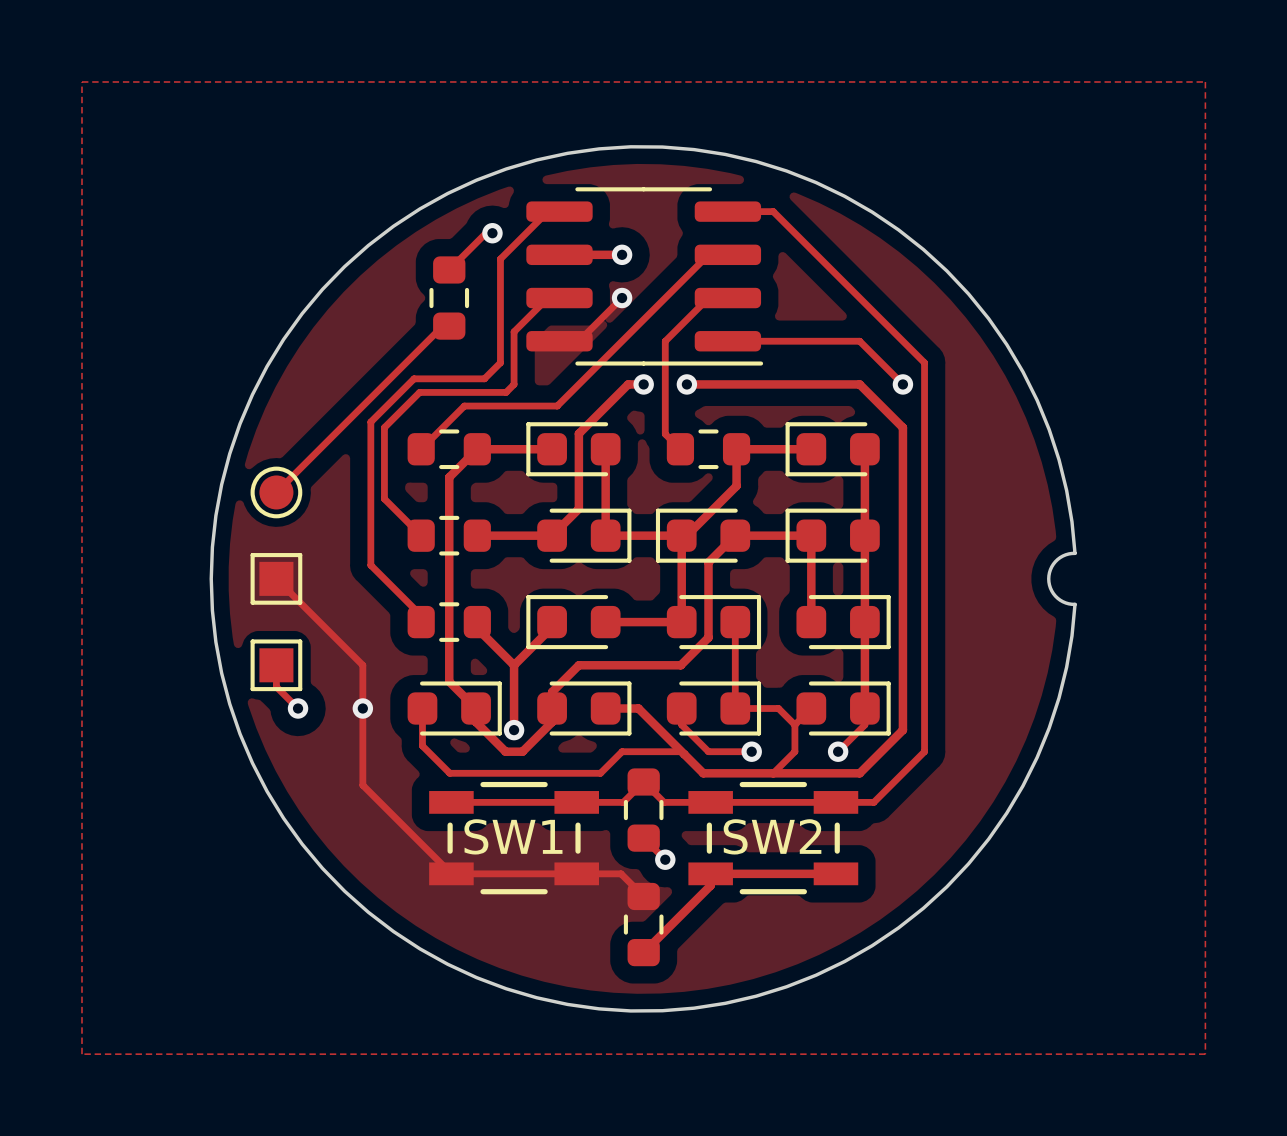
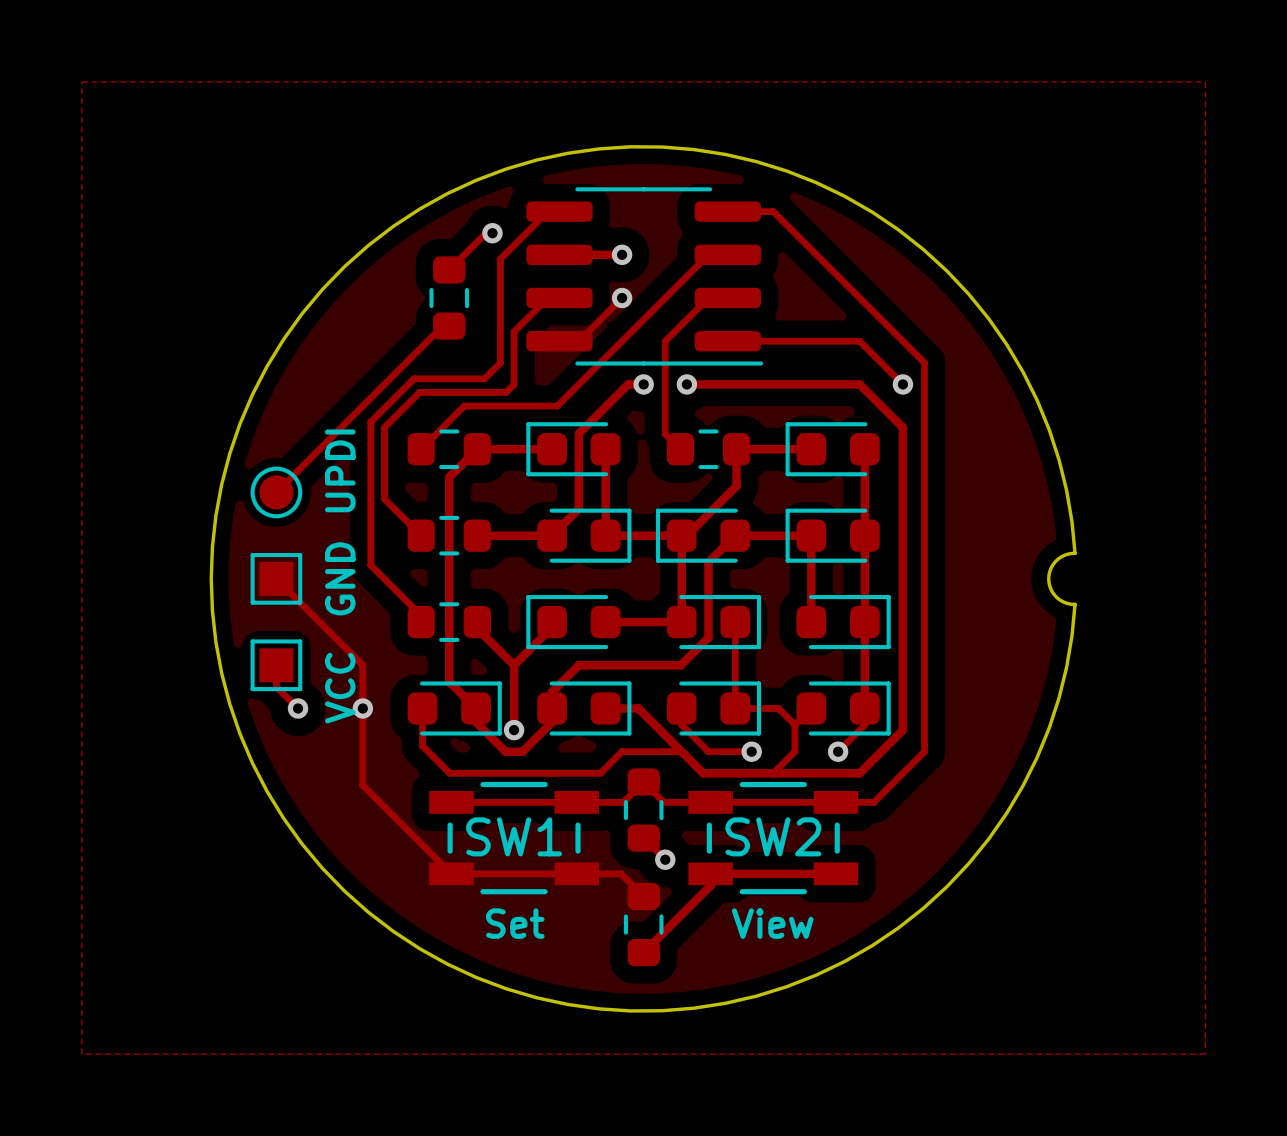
text: none -> UPDI (340, 470)
text: none -> GND (340, 578)
text: none -> VCC (340, 688)
text: none -> Set (515, 923)
text: none -> View (772, 923)

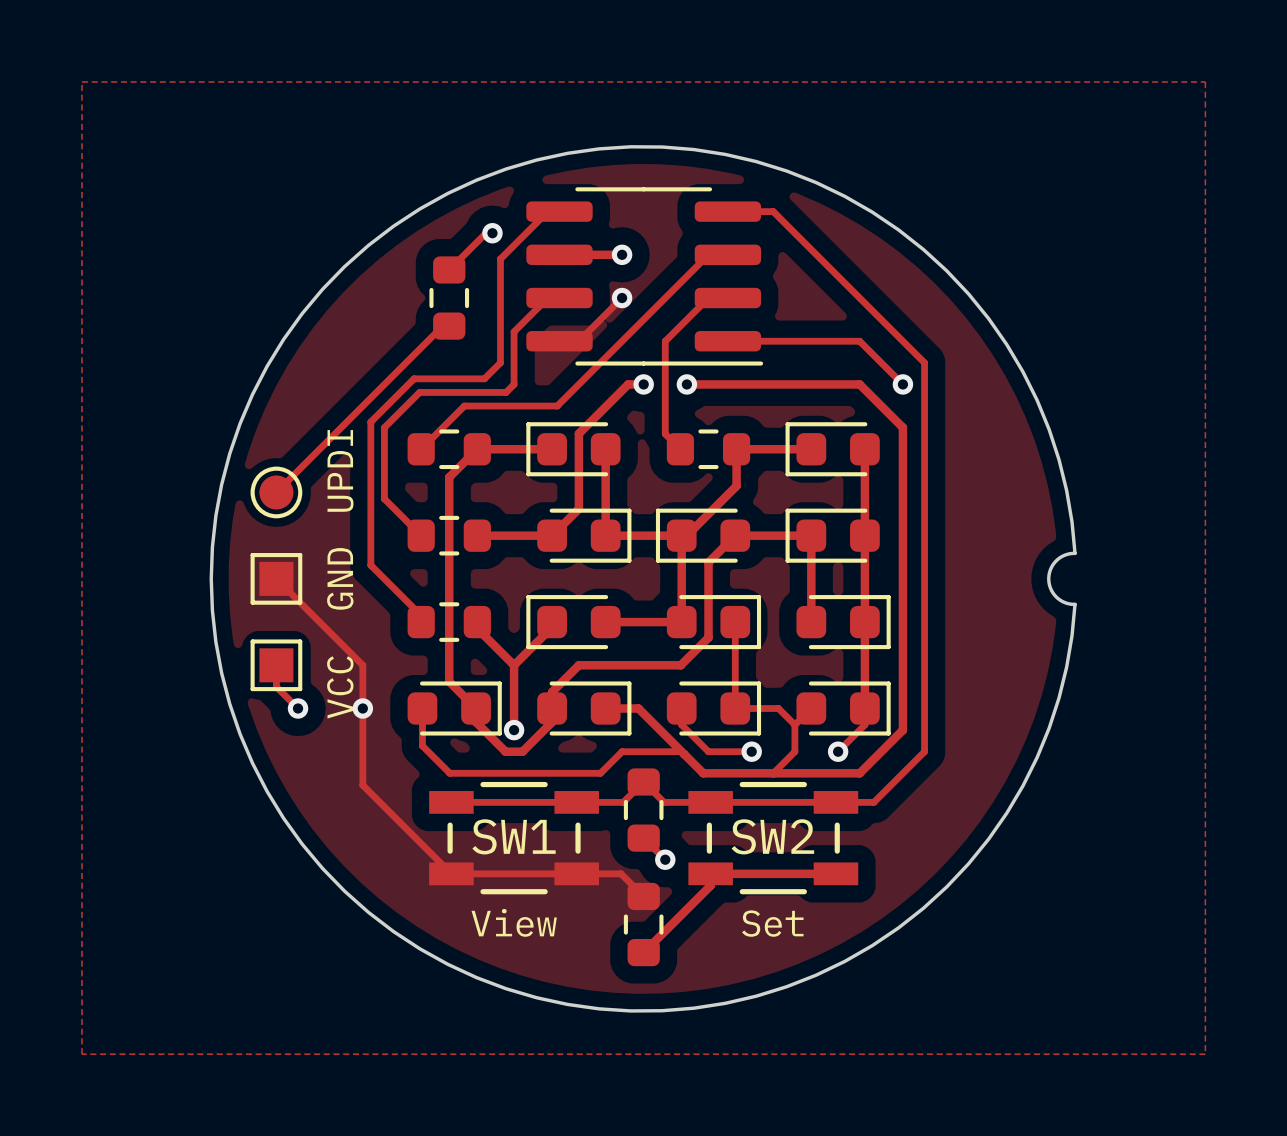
text: Set (515, 923) -> View (514, 922)
text: View (772, 923) -> Set (772, 923)

